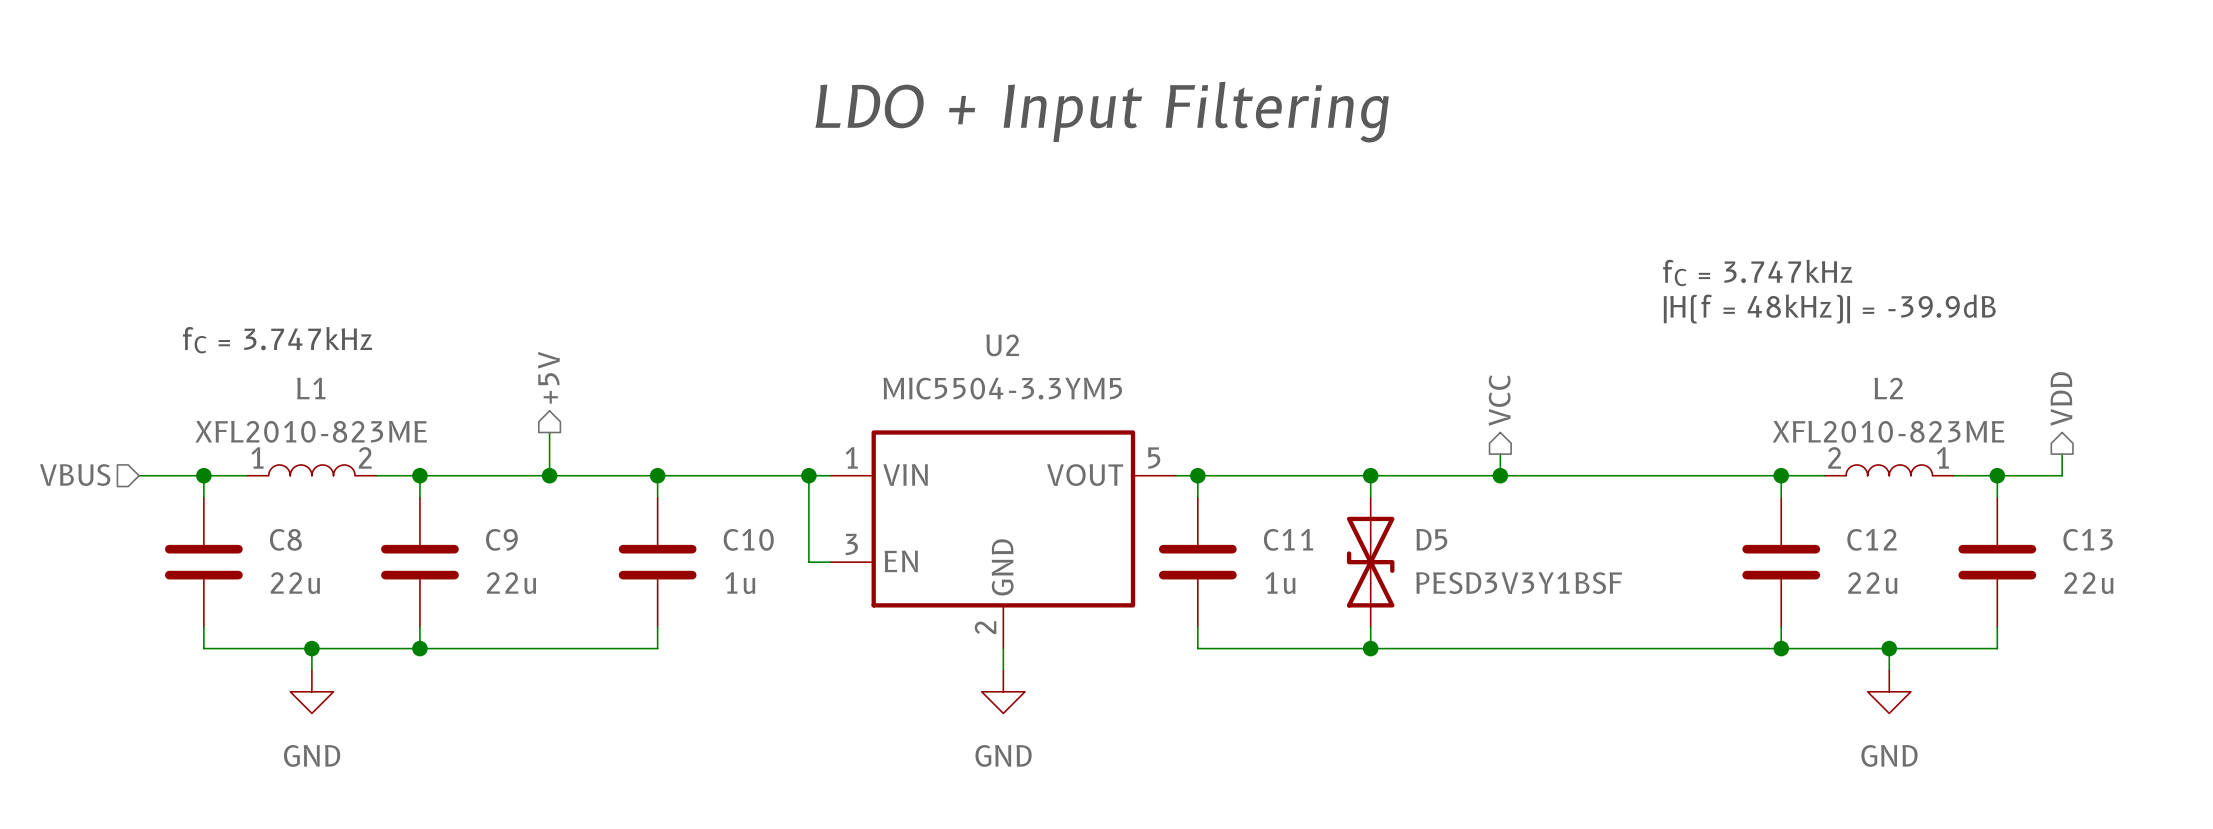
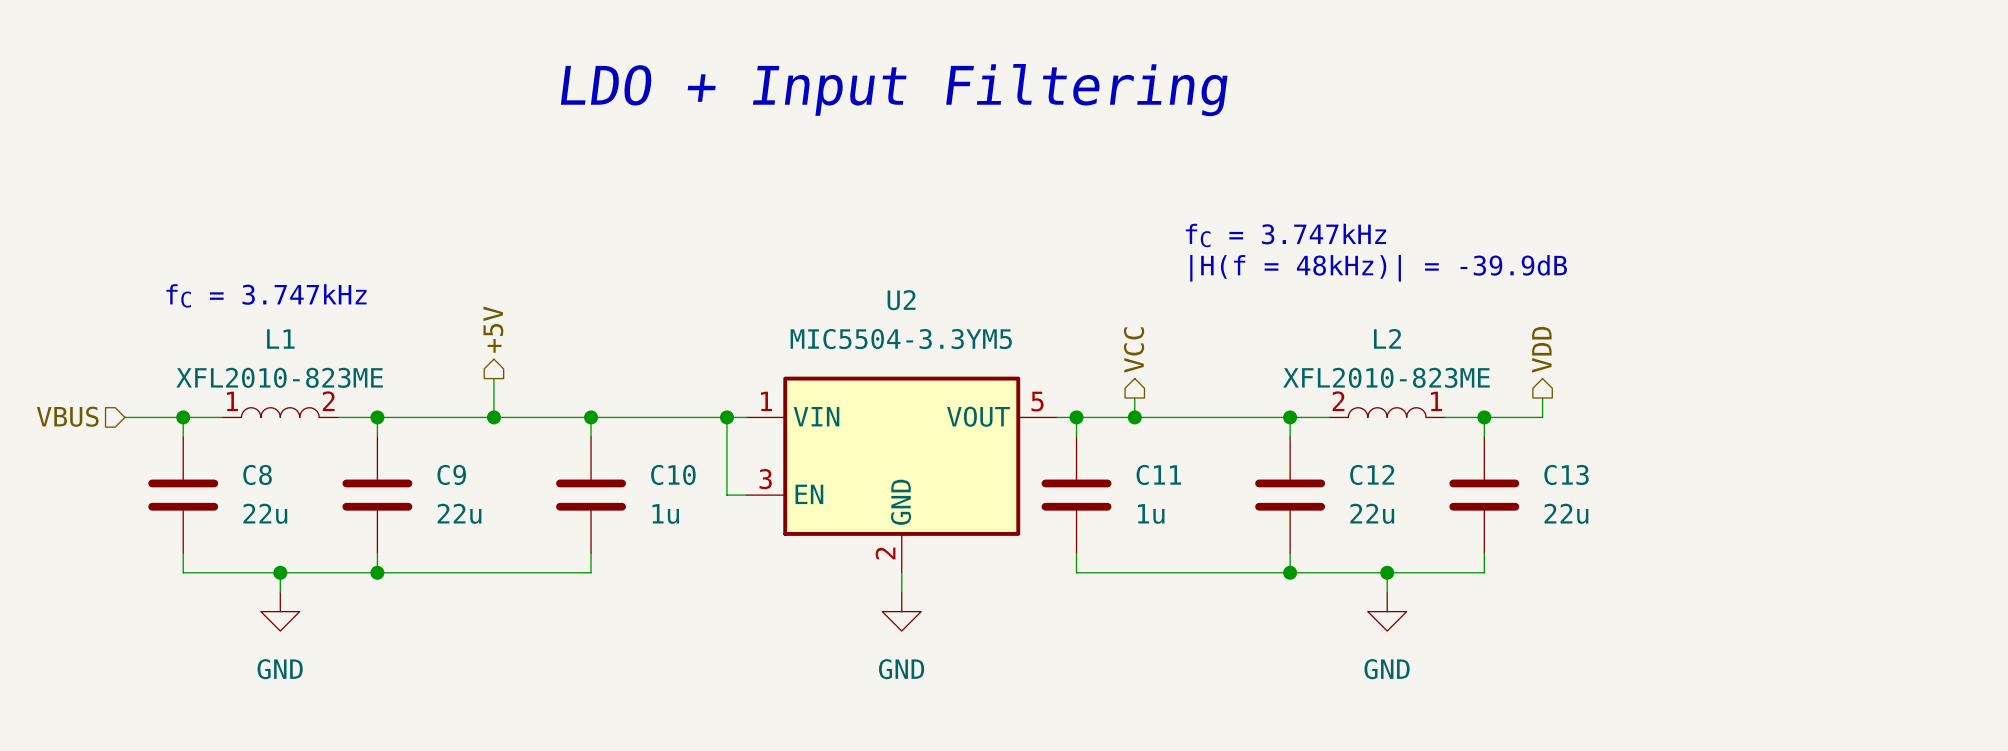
text position: LDO + Input Filtering (1102, 112) -> LDO + Input Filtering (894, 90)
text position: fC = 3.747kHz (1757, 272) -> fC = 3.747kHz (1285, 235)
text position: |H(f = 48kHz)| = -39.9dB (1829, 309) -> |H(f = 48kHz)| = -39.9dB (1378, 268)
hierarchical label position: VDD (2061, 398) -> VDD (1541, 349)
hierarchical label position: VCC (1499, 400) -> VCC (1134, 349)
wire: (1500, 454) (1500, 475) -> none
wire: (2062, 454) (2062, 475) (1954, 475) -> none
L2 position: (1889, 470) -> (1387, 412)
junction: none -> (1134, 417)
wire: (1370, 475) (1370, 497) -> (1134, 398) (1134, 417)
junction: (1370, 475) -> none
junction: none -> (1290, 417)
wire: (1478, 475) (1608, 475) -> none
junction: (1500, 475) -> none
junction: none -> (1484, 417)
wire: (1716, 475) (1824, 475) -> (1542, 417) (1542, 398)
wire: (1781, 475) (1781, 497) -> (1290, 417) (1290, 436)
junction: (1781, 475) -> none
wire: (1997, 475) (1997, 497) -> (1484, 417) (1484, 436)
junction: (1997, 475) -> none
D5: PESD3V3Y1BSF (1370, 562) -> none
C12 position: (1781, 562) -> (1290, 495)
C13 position: (1997, 562) -> (1484, 495)
wire: (1370, 626) (1370, 648) -> none
wire: (1781, 626) (1781, 648) -> (1290, 553) (1290, 572)
wire: (1997, 626) (1997, 648) (1651, 648) -> (1484, 553) (1484, 572)
junction position: (1370, 648) -> (1290, 572)
junction: none -> (1387, 572)
junction: (1781, 648) -> none
wire: (1889, 648) (1889, 670) -> (1387, 572) (1387, 592)
junction: (1889, 648) -> none
power symbol position: GND (1889, 691) -> GND (1387, 611)

